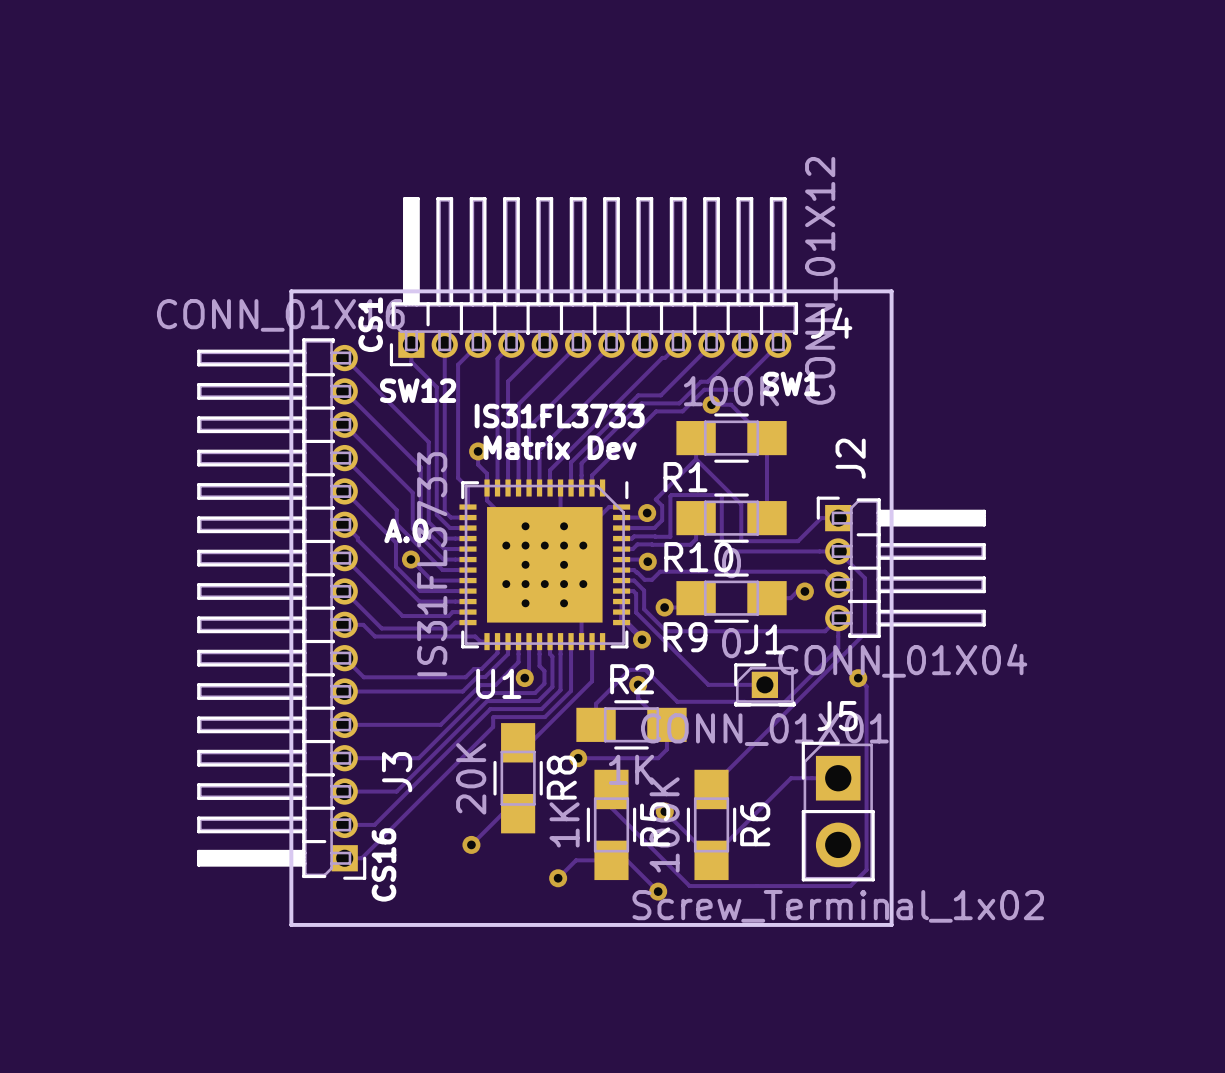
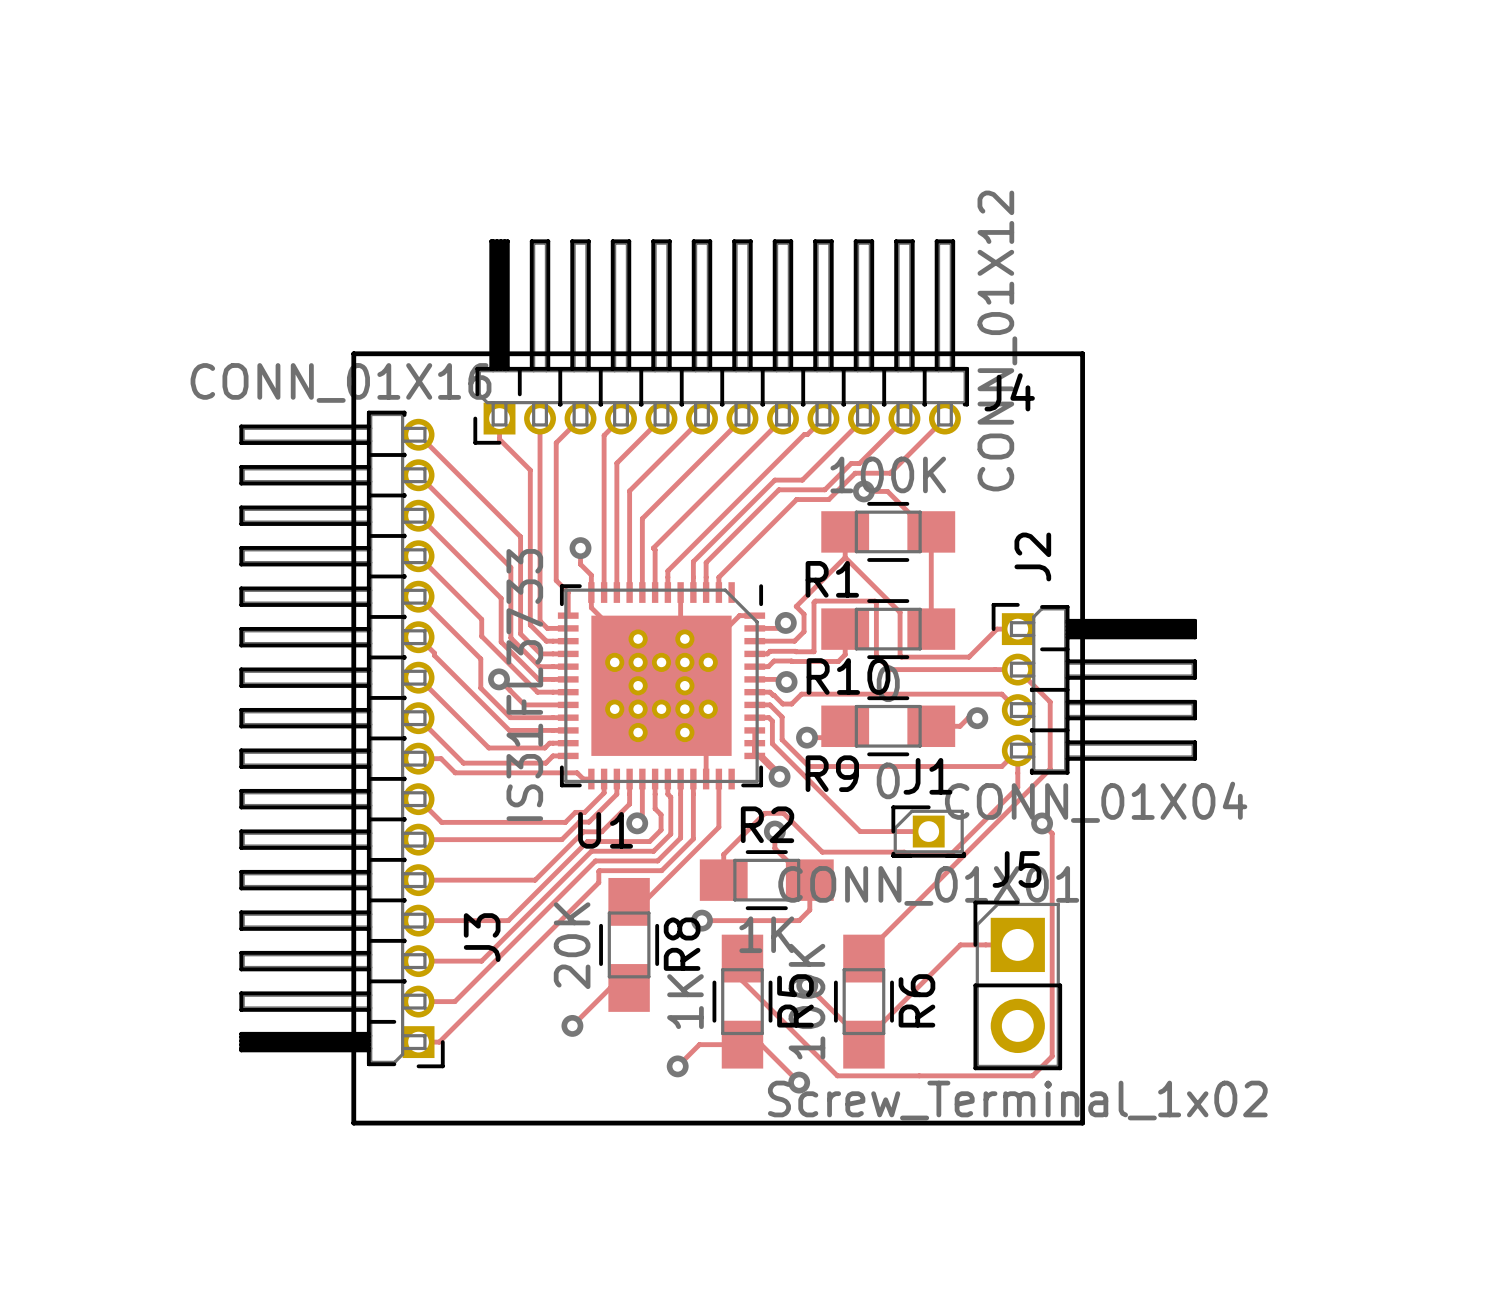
text: CS1 (370, 324) -> none
text: SW1 (791, 383) -> none
text: SW12 (418, 390) -> none
text: IS31FL3733 (559, 416) -> none
text: Matrix Dev (560, 447) -> none
text: A.0 (406, 530) -> none
text: CS16 (383, 864) -> none

